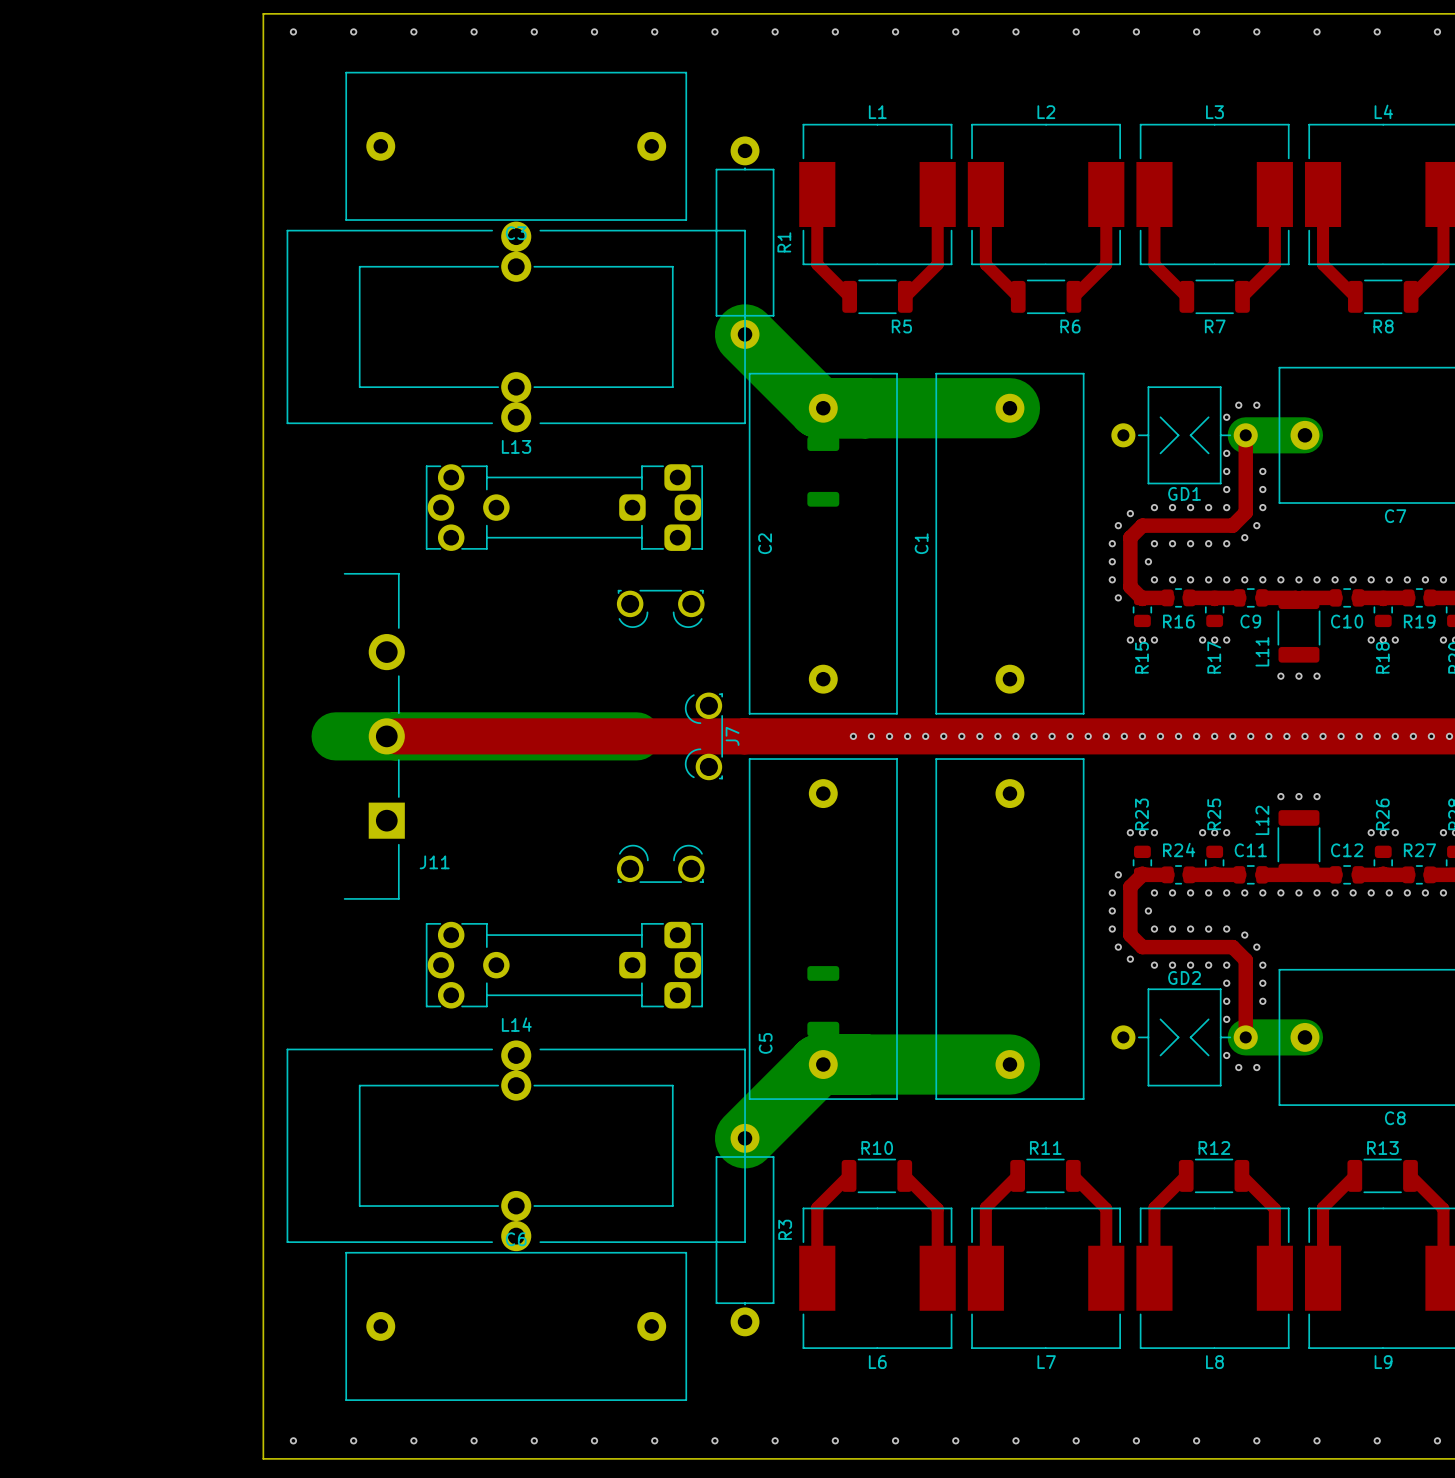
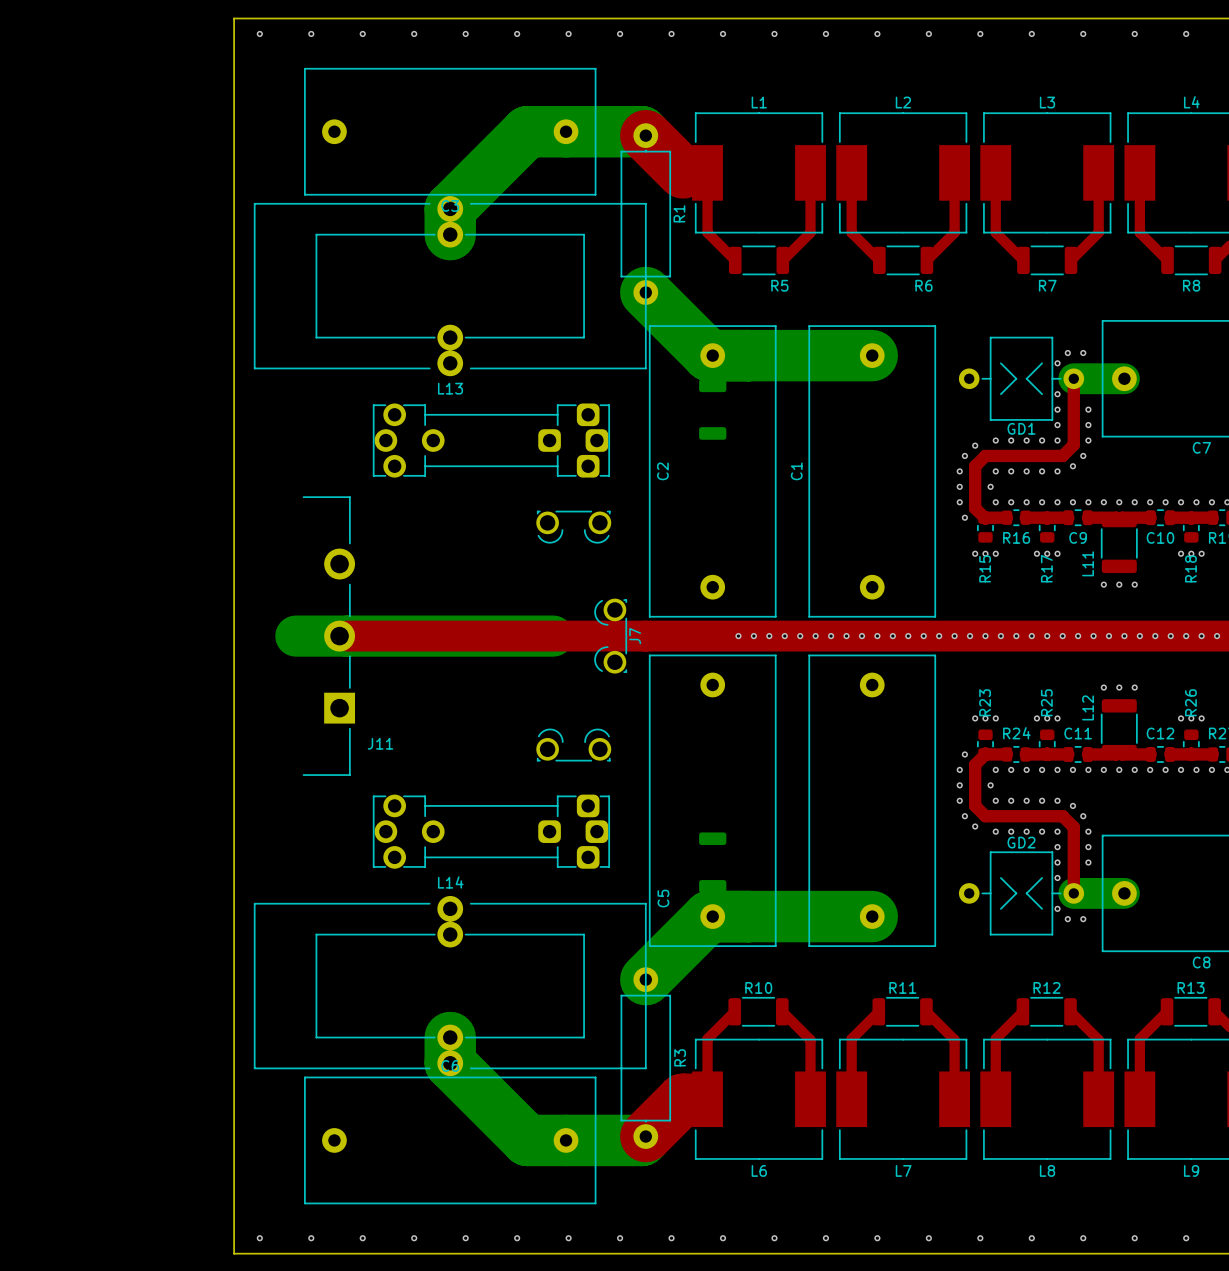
top track: none -> (645, 135) (683, 172)
bottom track: none -> (645, 135) (641, 131) (527, 131) (450, 208) (450, 234)
bottom track: none -> (450, 1037) (450, 1063) (527, 1140) (641, 1140) (645, 1136)
top track: none -> (697, 1099) (683, 1099) (645, 1136)

